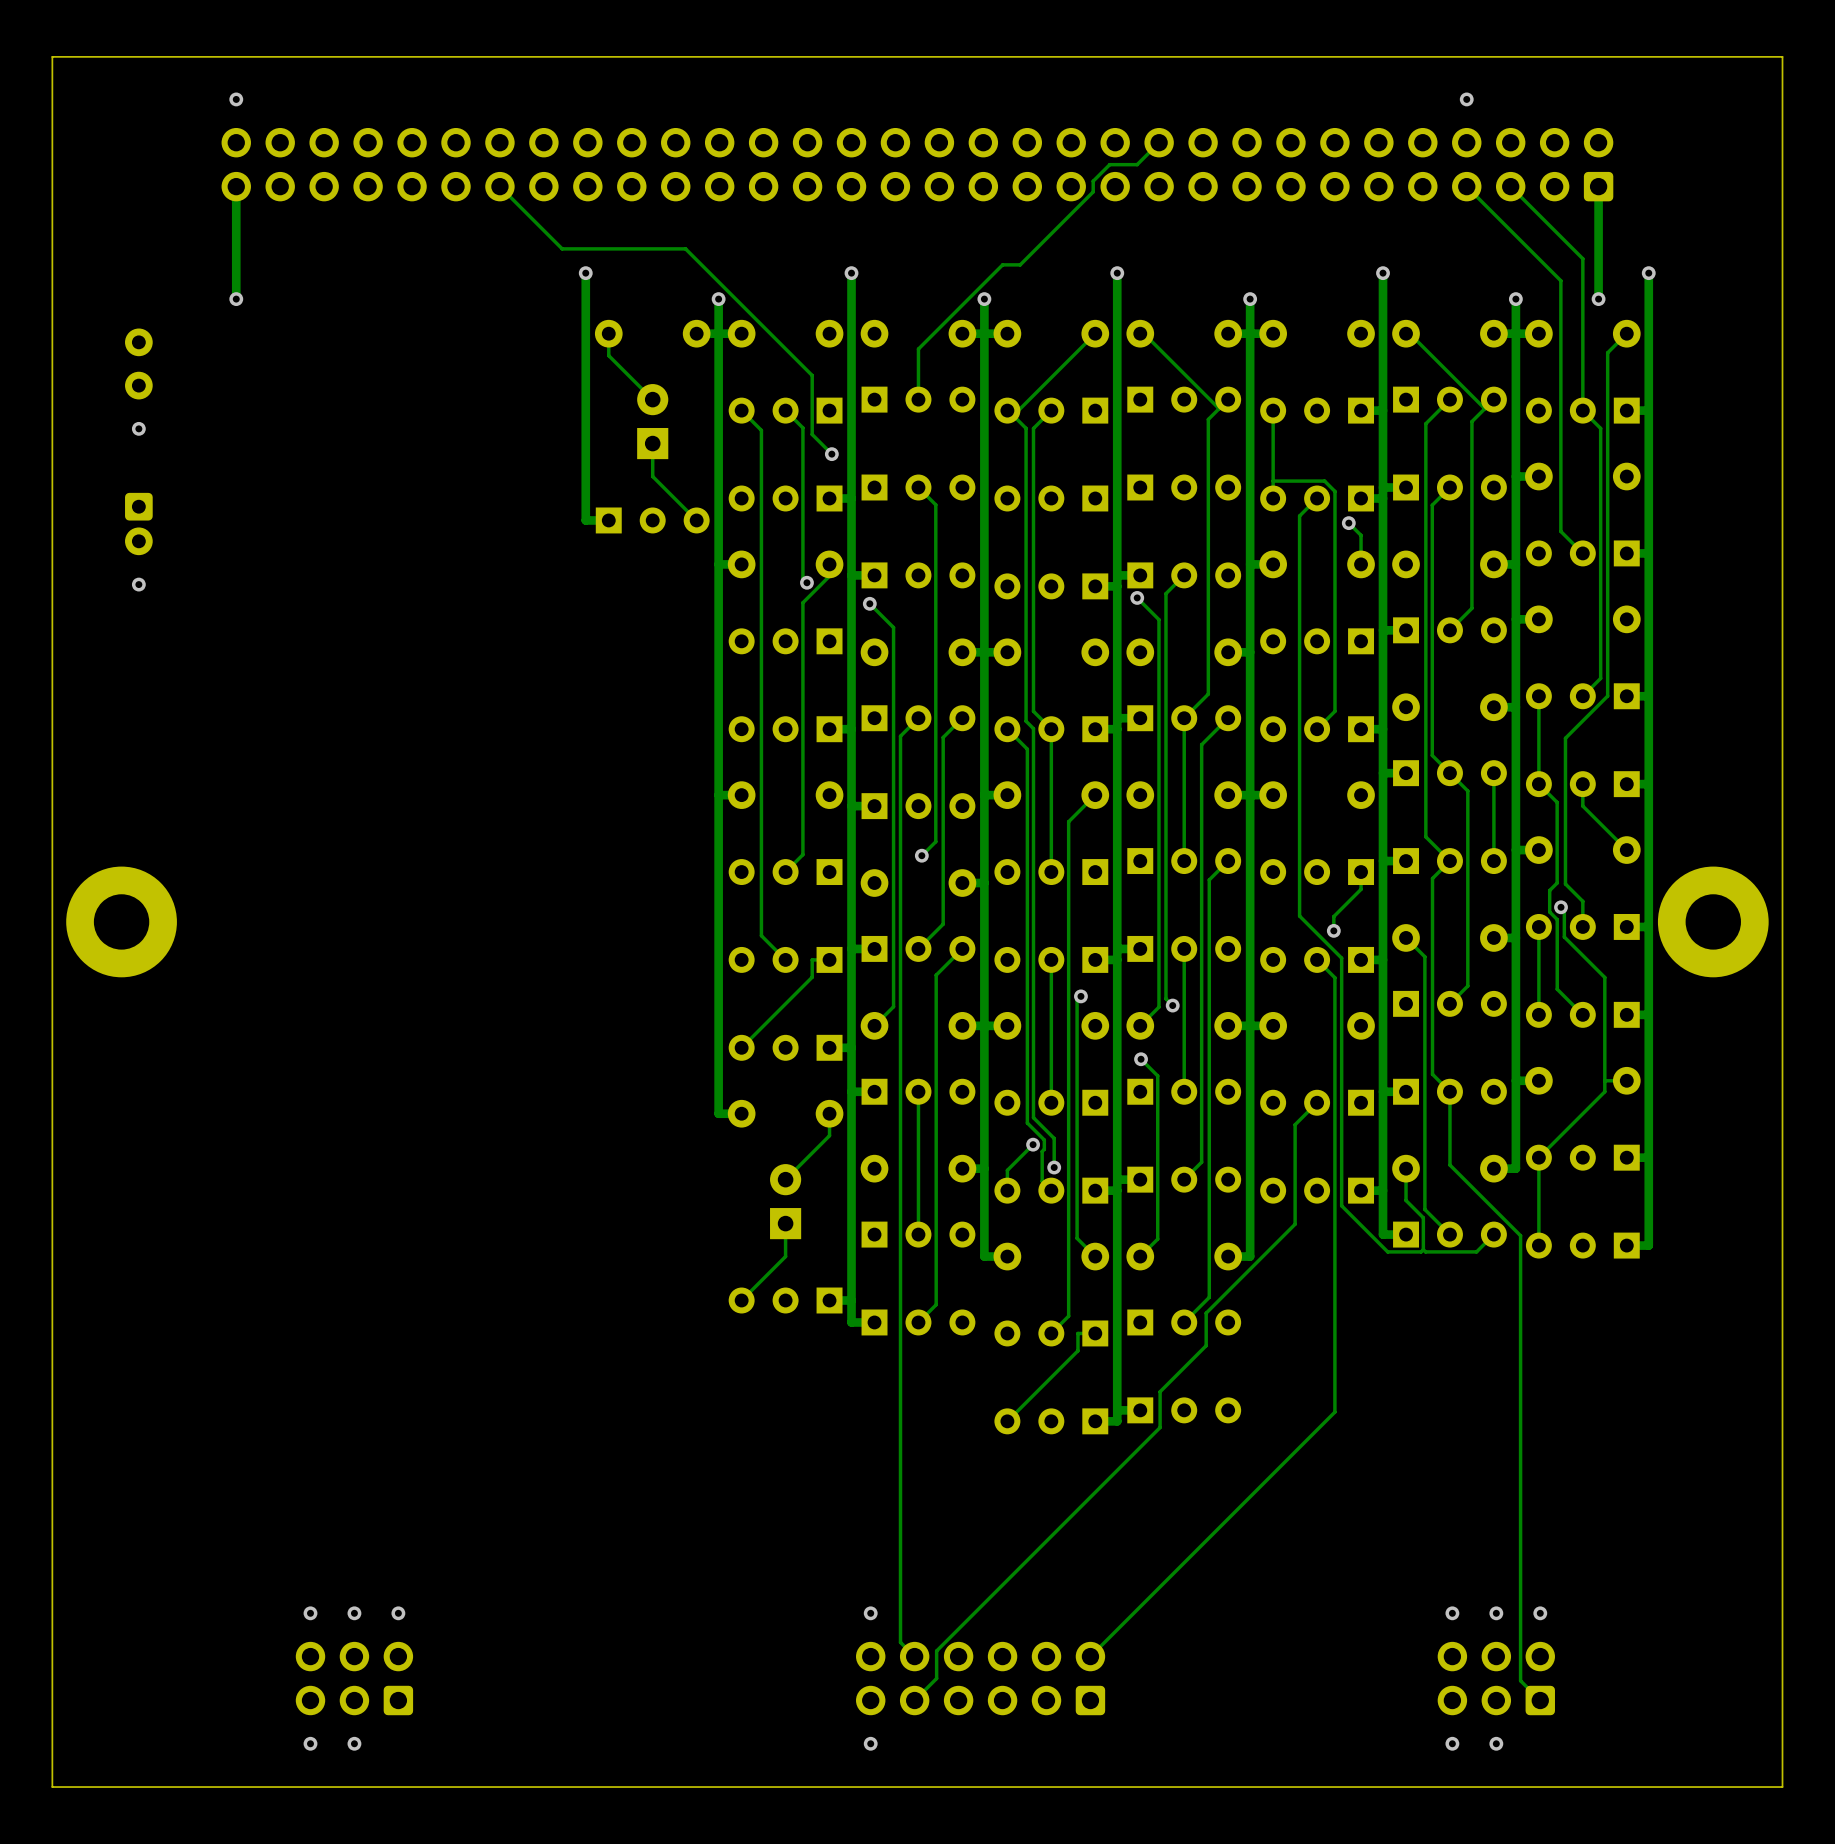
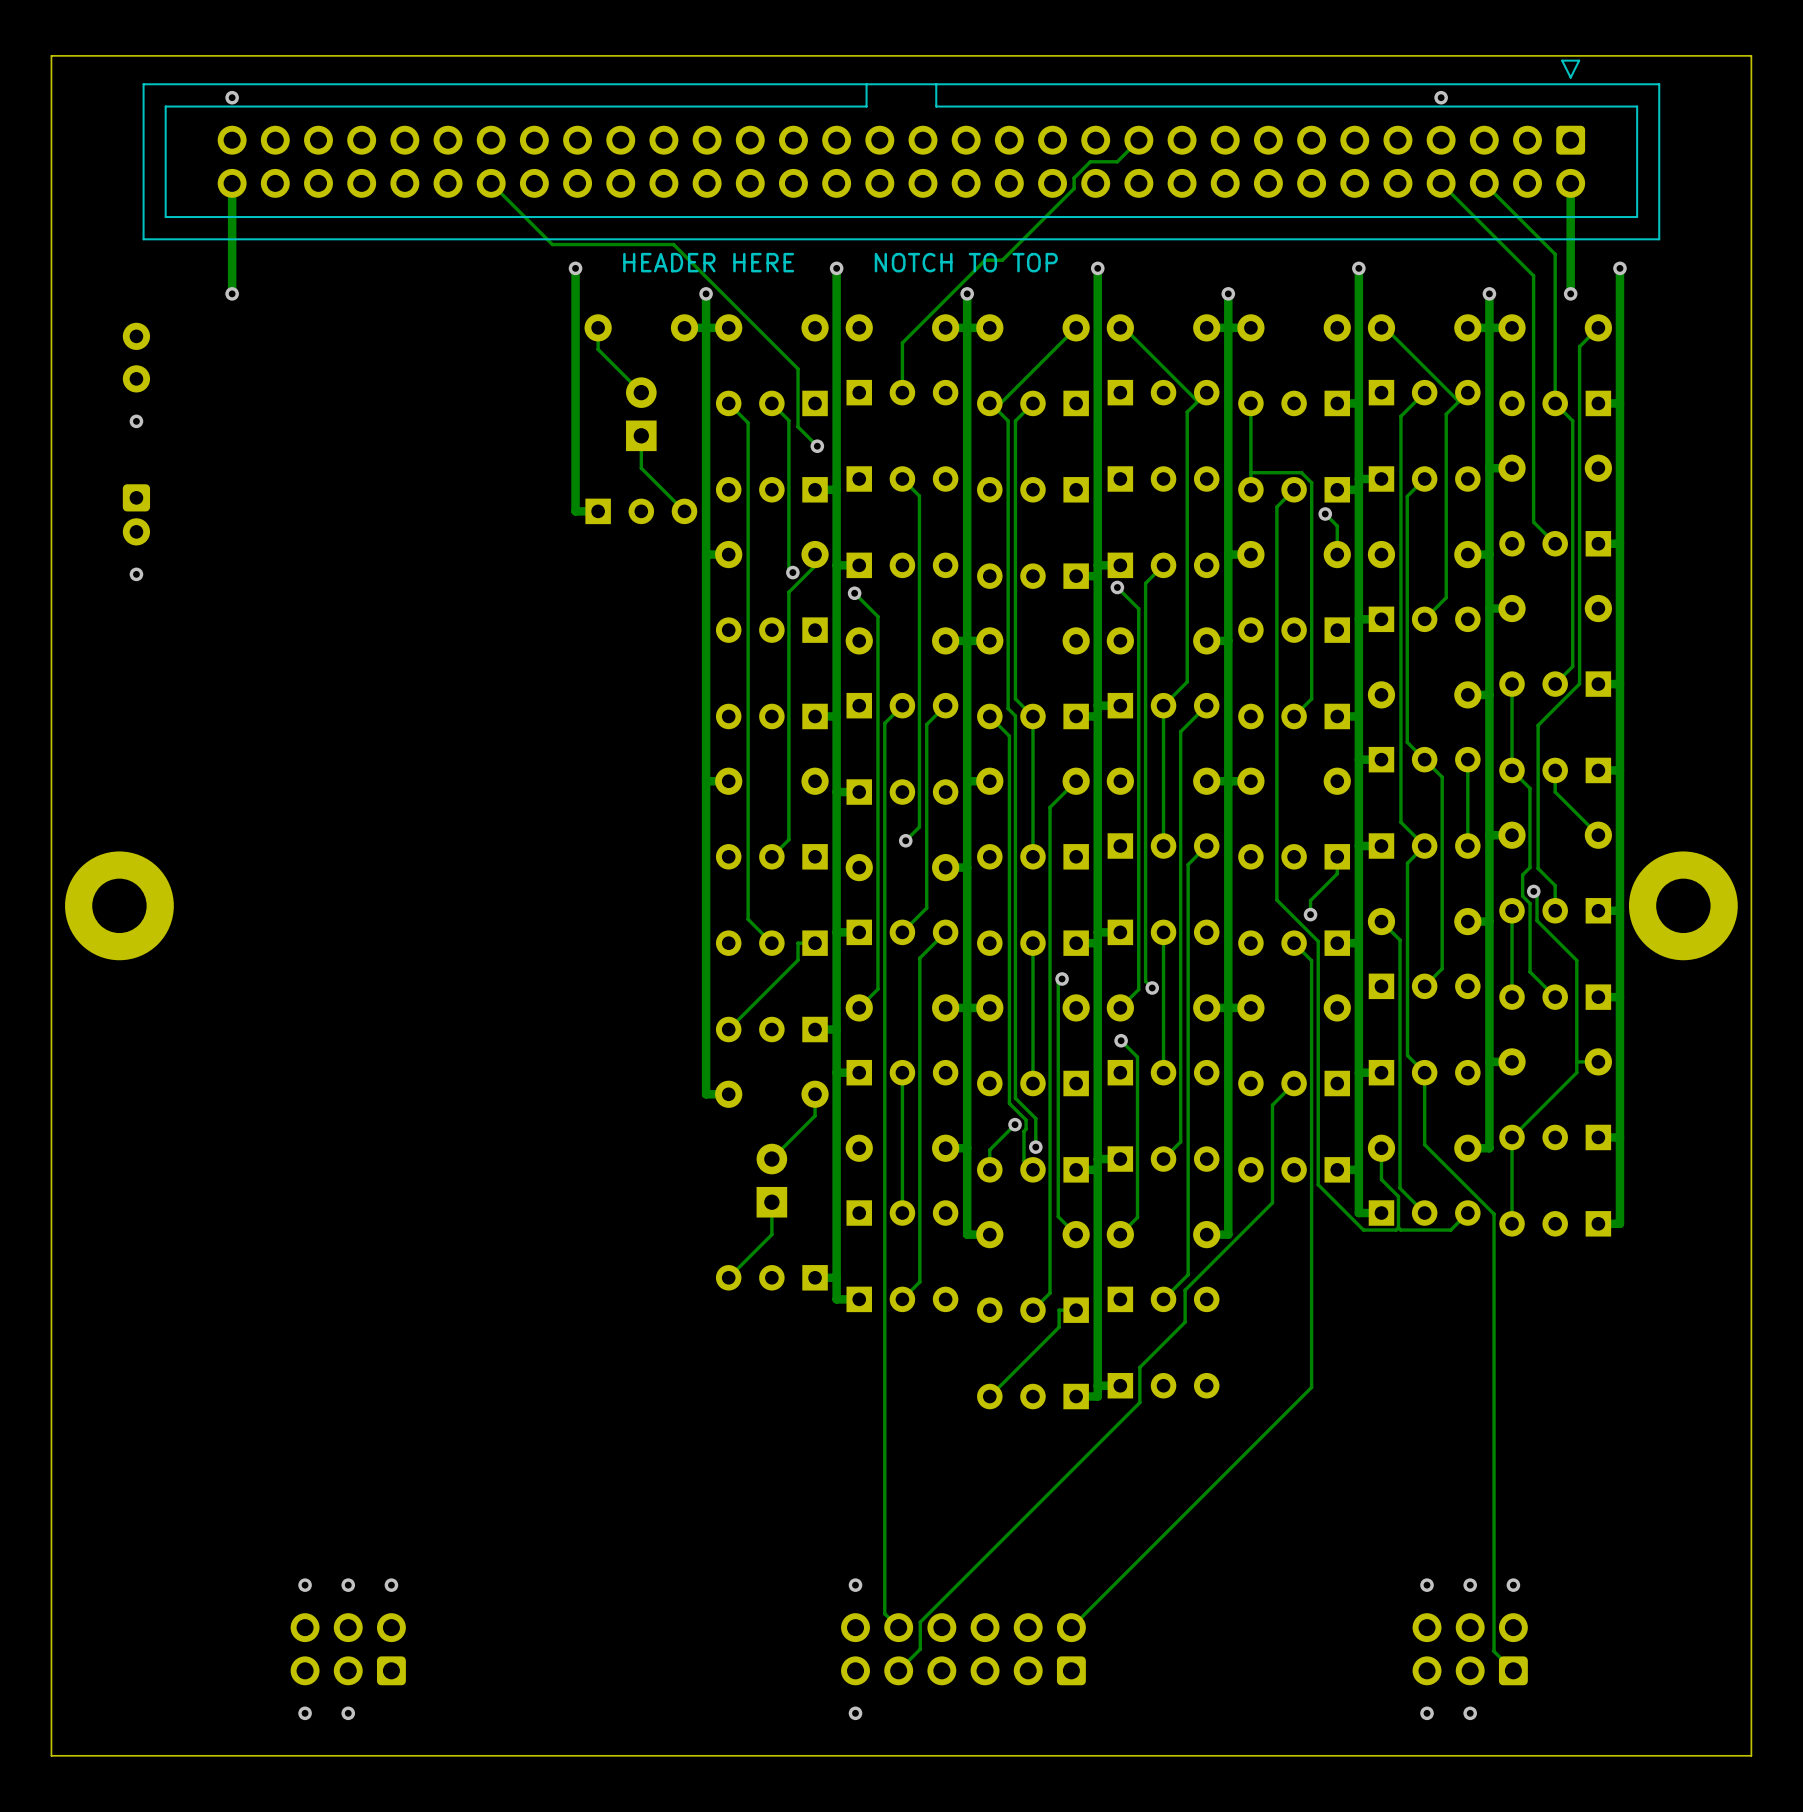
part side: top (917, 164) -> bottom (901, 149)
text: none -> HEADER HERE (708, 262)
text: none -> NOTCH TO TOP (966, 262)

